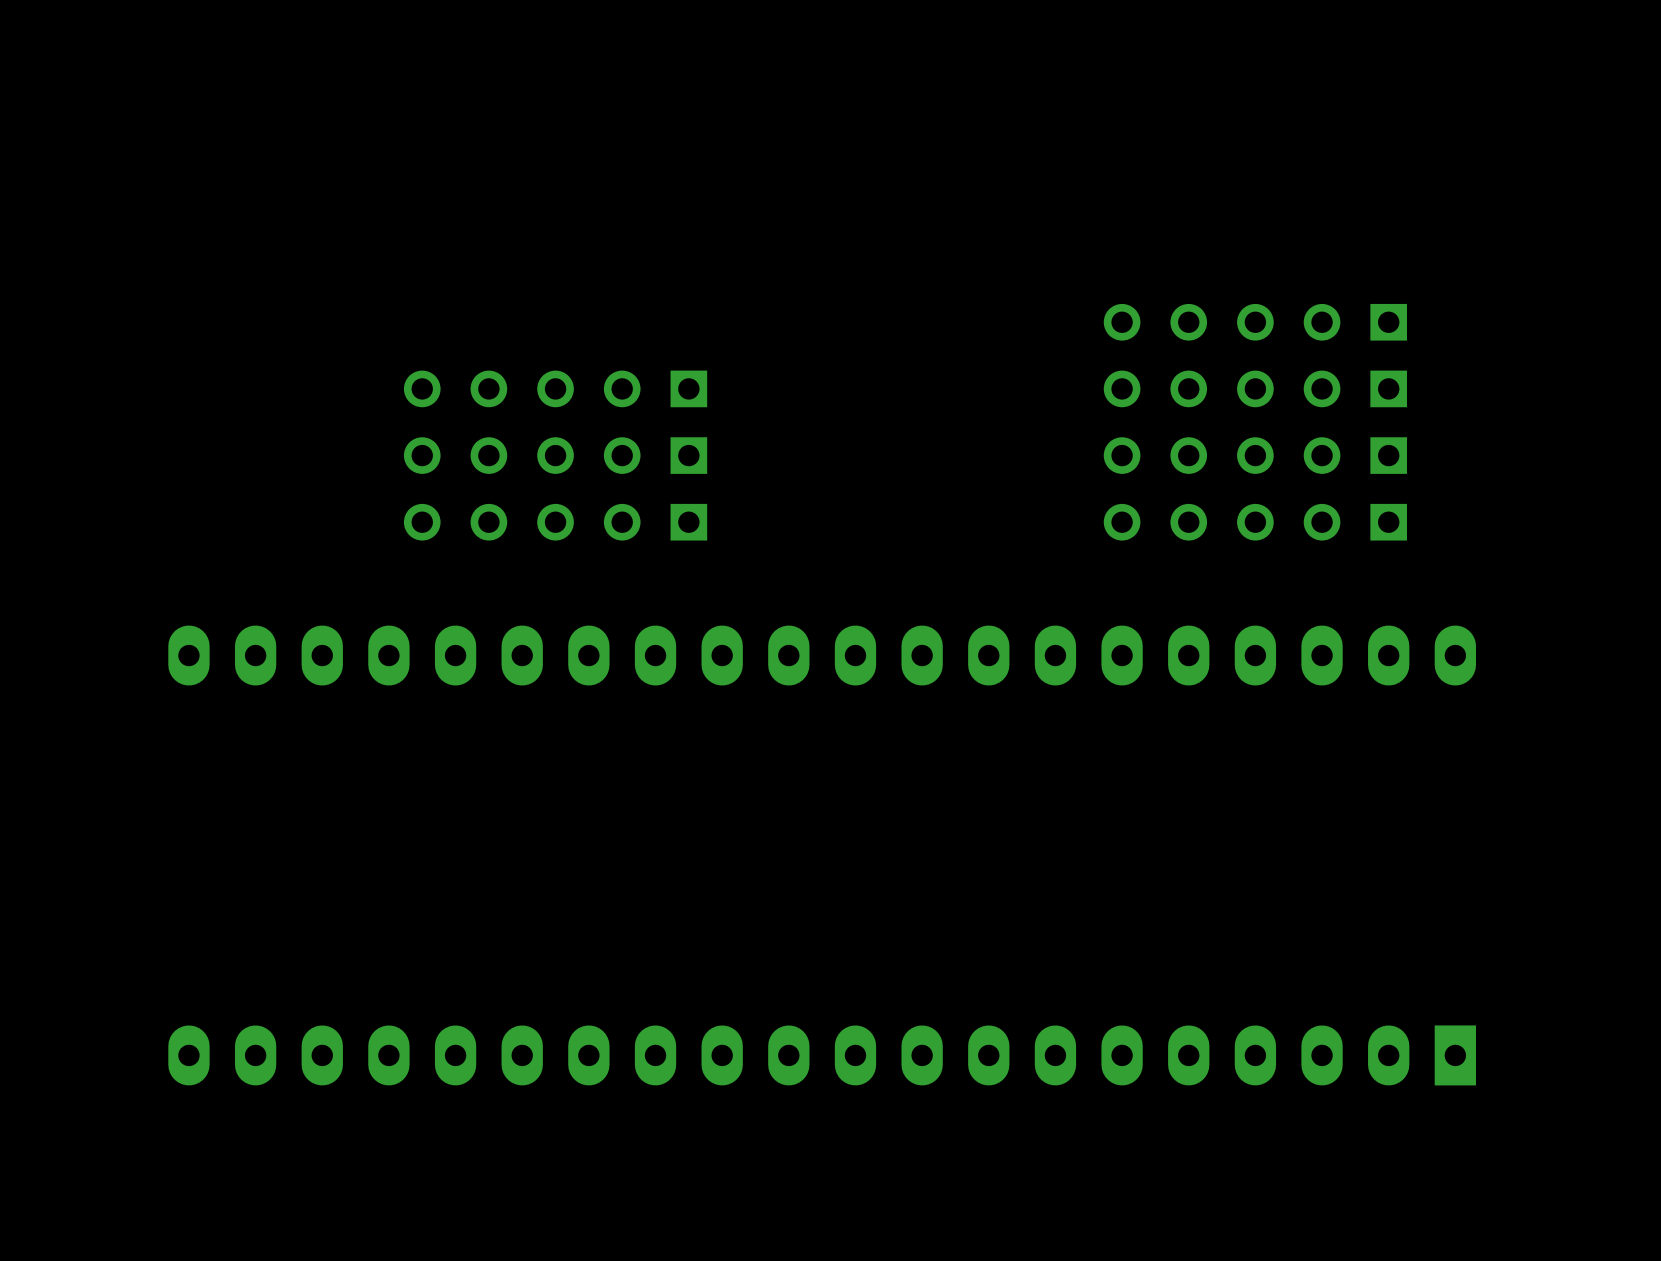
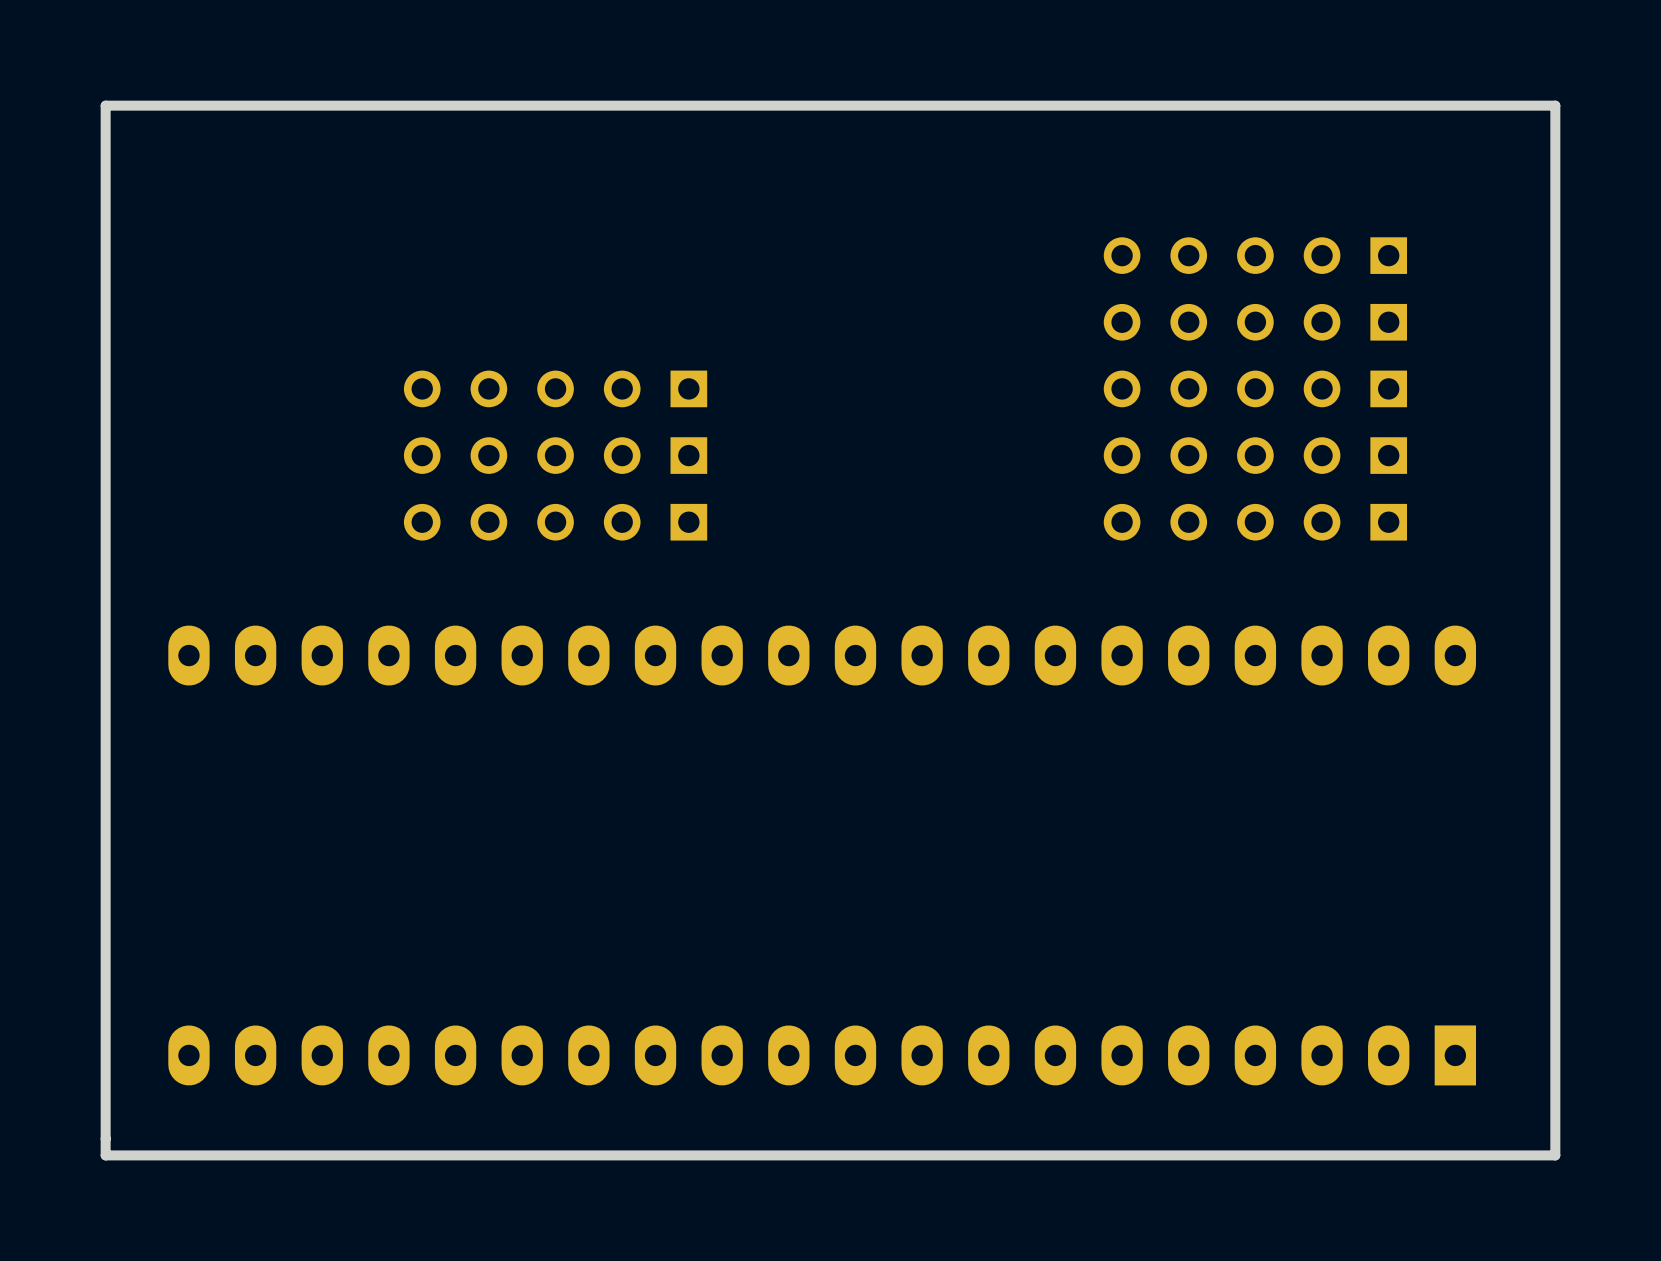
board edge: none -> (1555, 105) (1555, 1155) (105, 1155) (105, 105) (1555, 105)
part: none -> (1255, 255)

